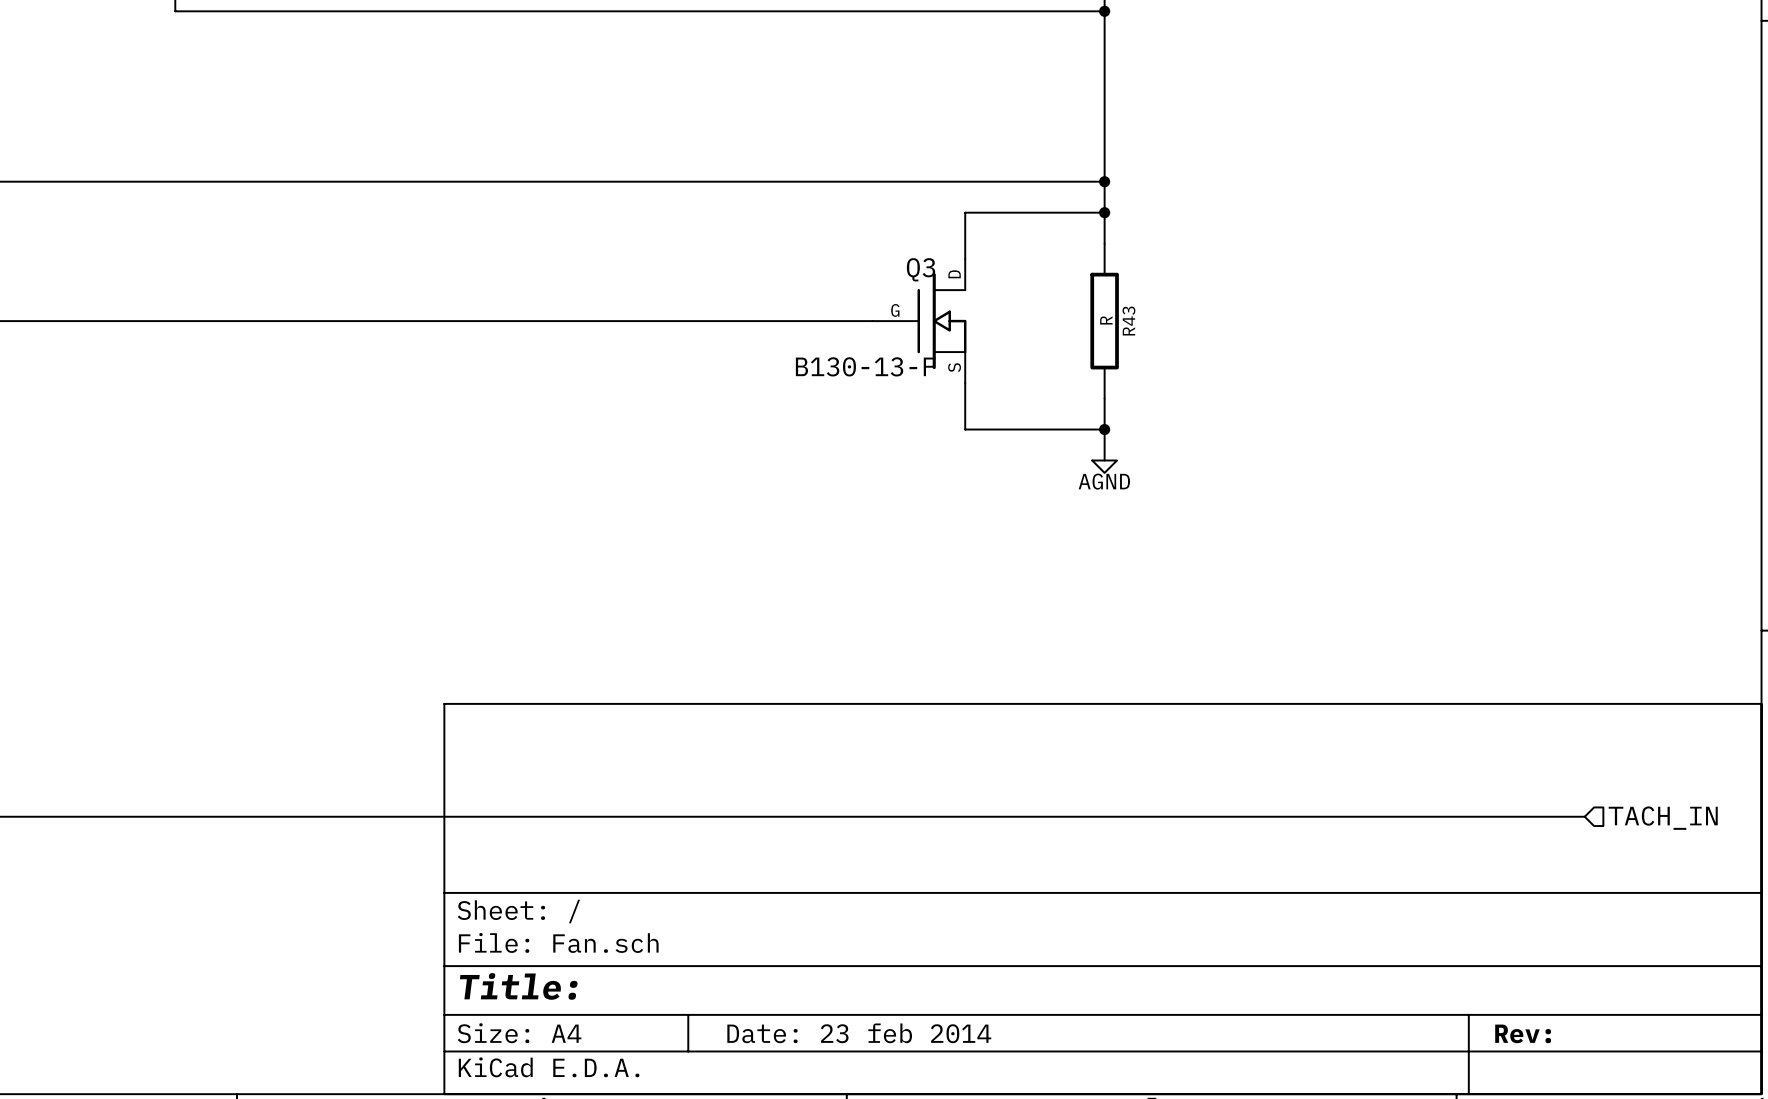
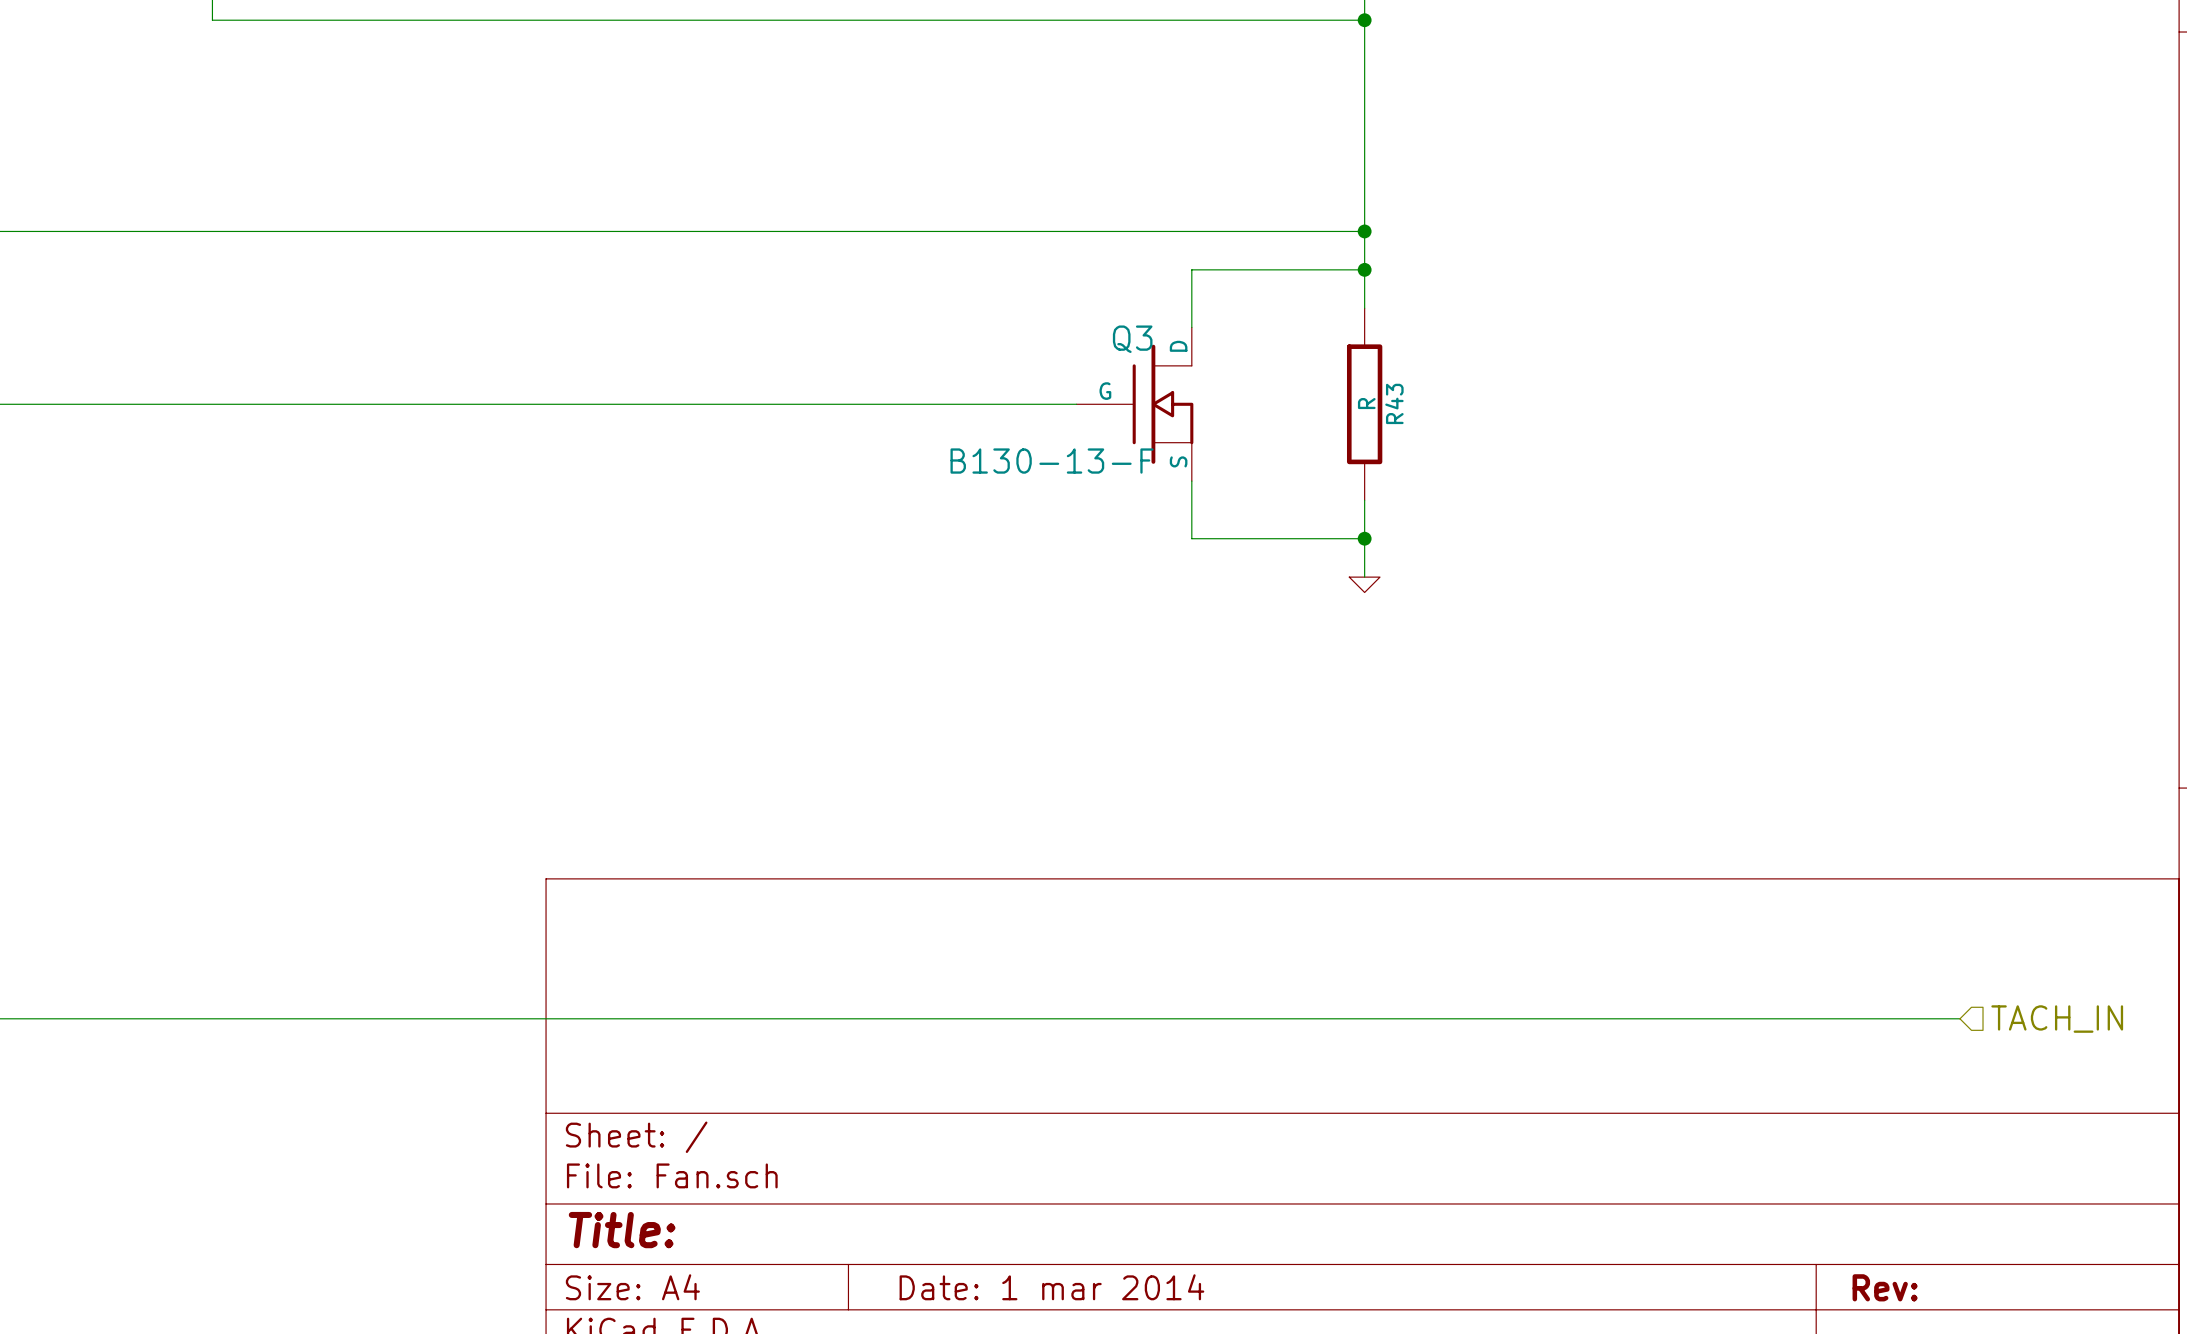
power symbol text: AGND (1104, 481) -> none
title block: Date: 23 feb 2014 (859, 1033) -> Date: 1 mar 2014 (1051, 1287)

